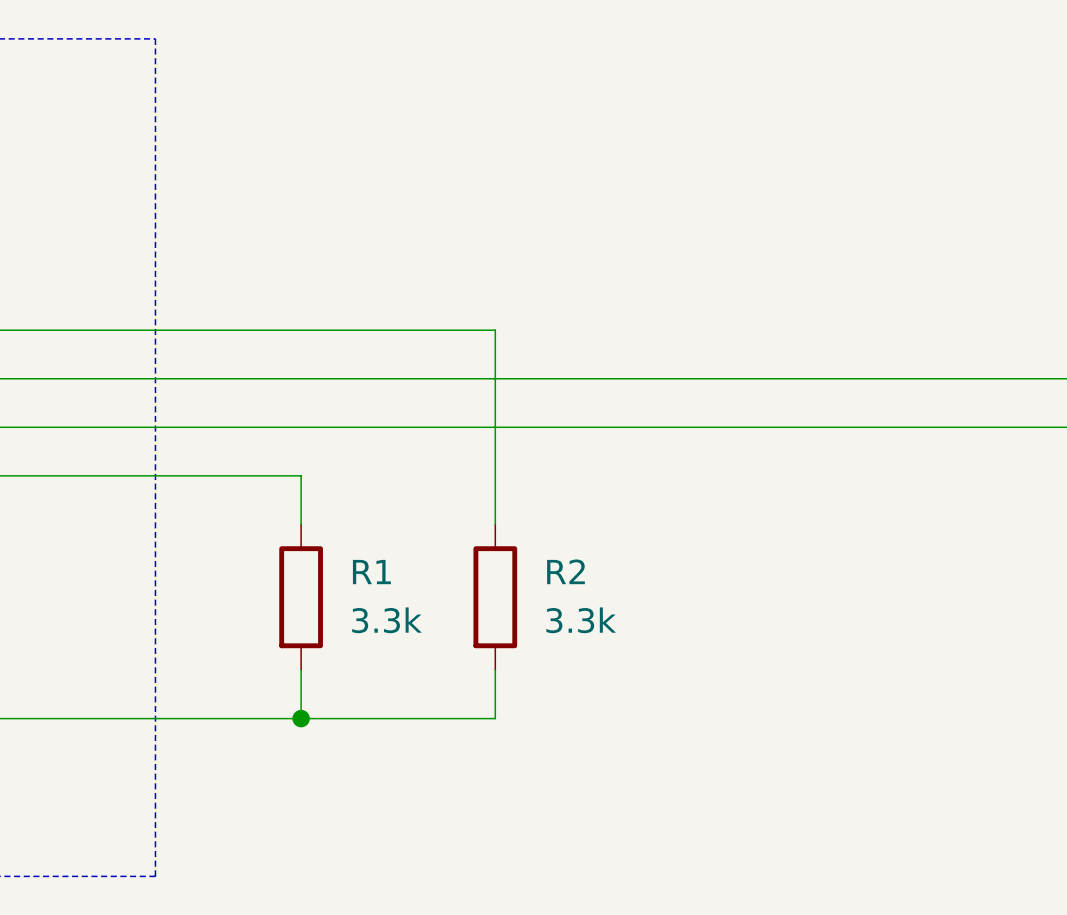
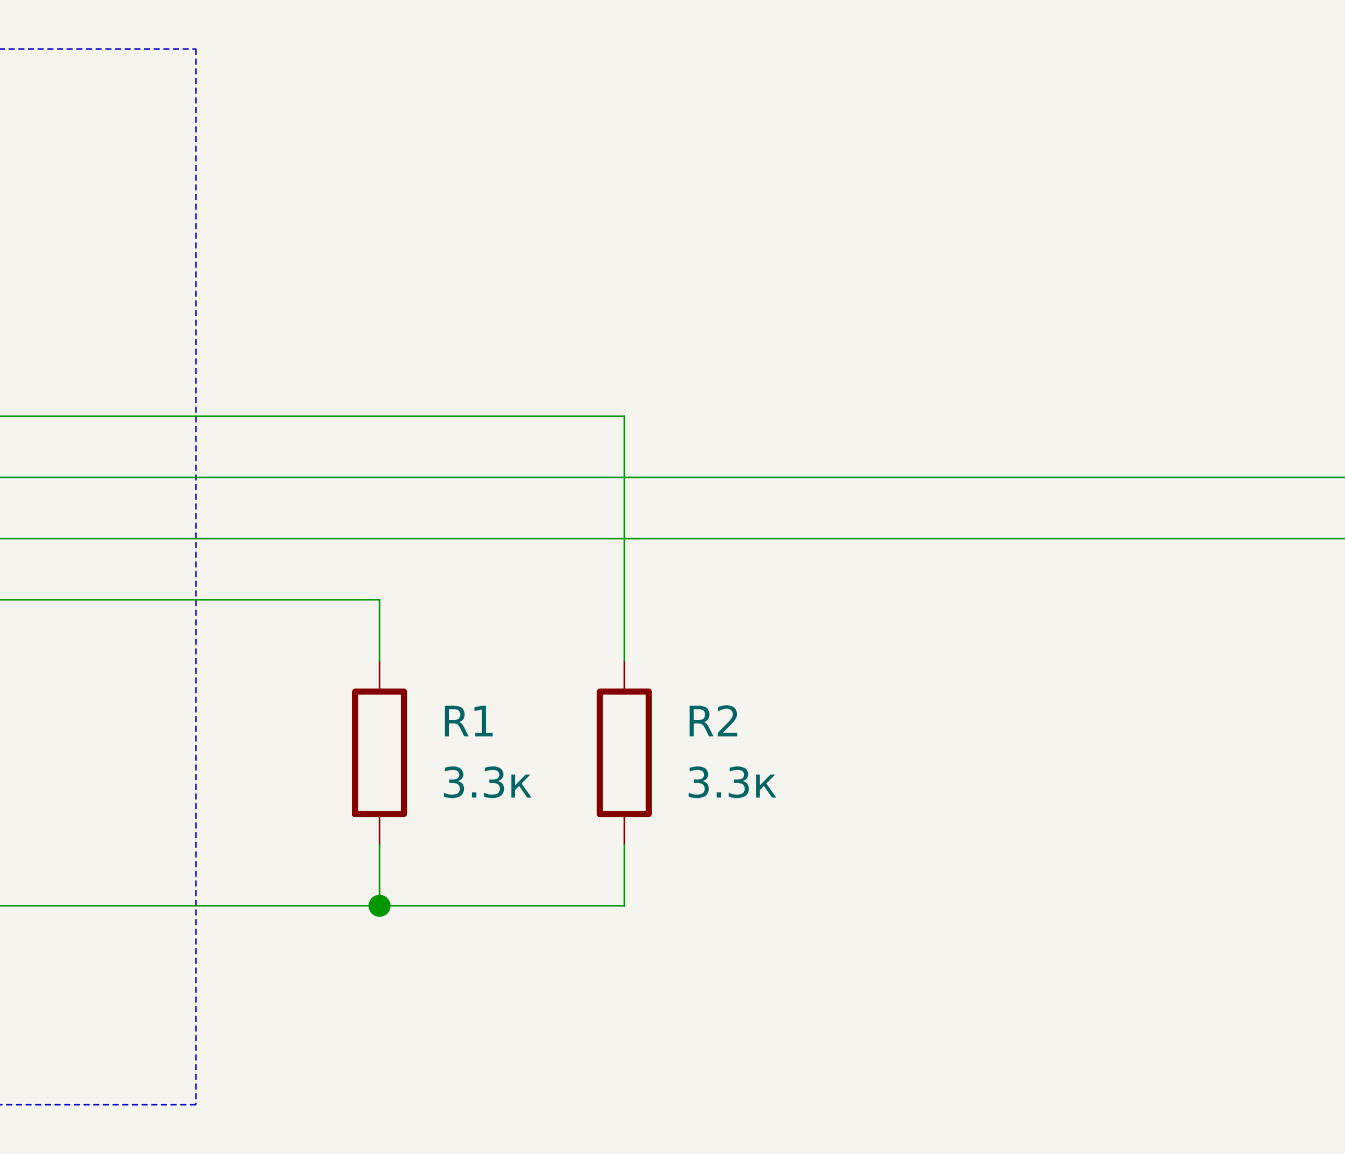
R1 value: 3.3k (387, 620) -> 3.3к (487, 782)
R2 value: 3.3k (581, 620) -> 3.3к (732, 782)

